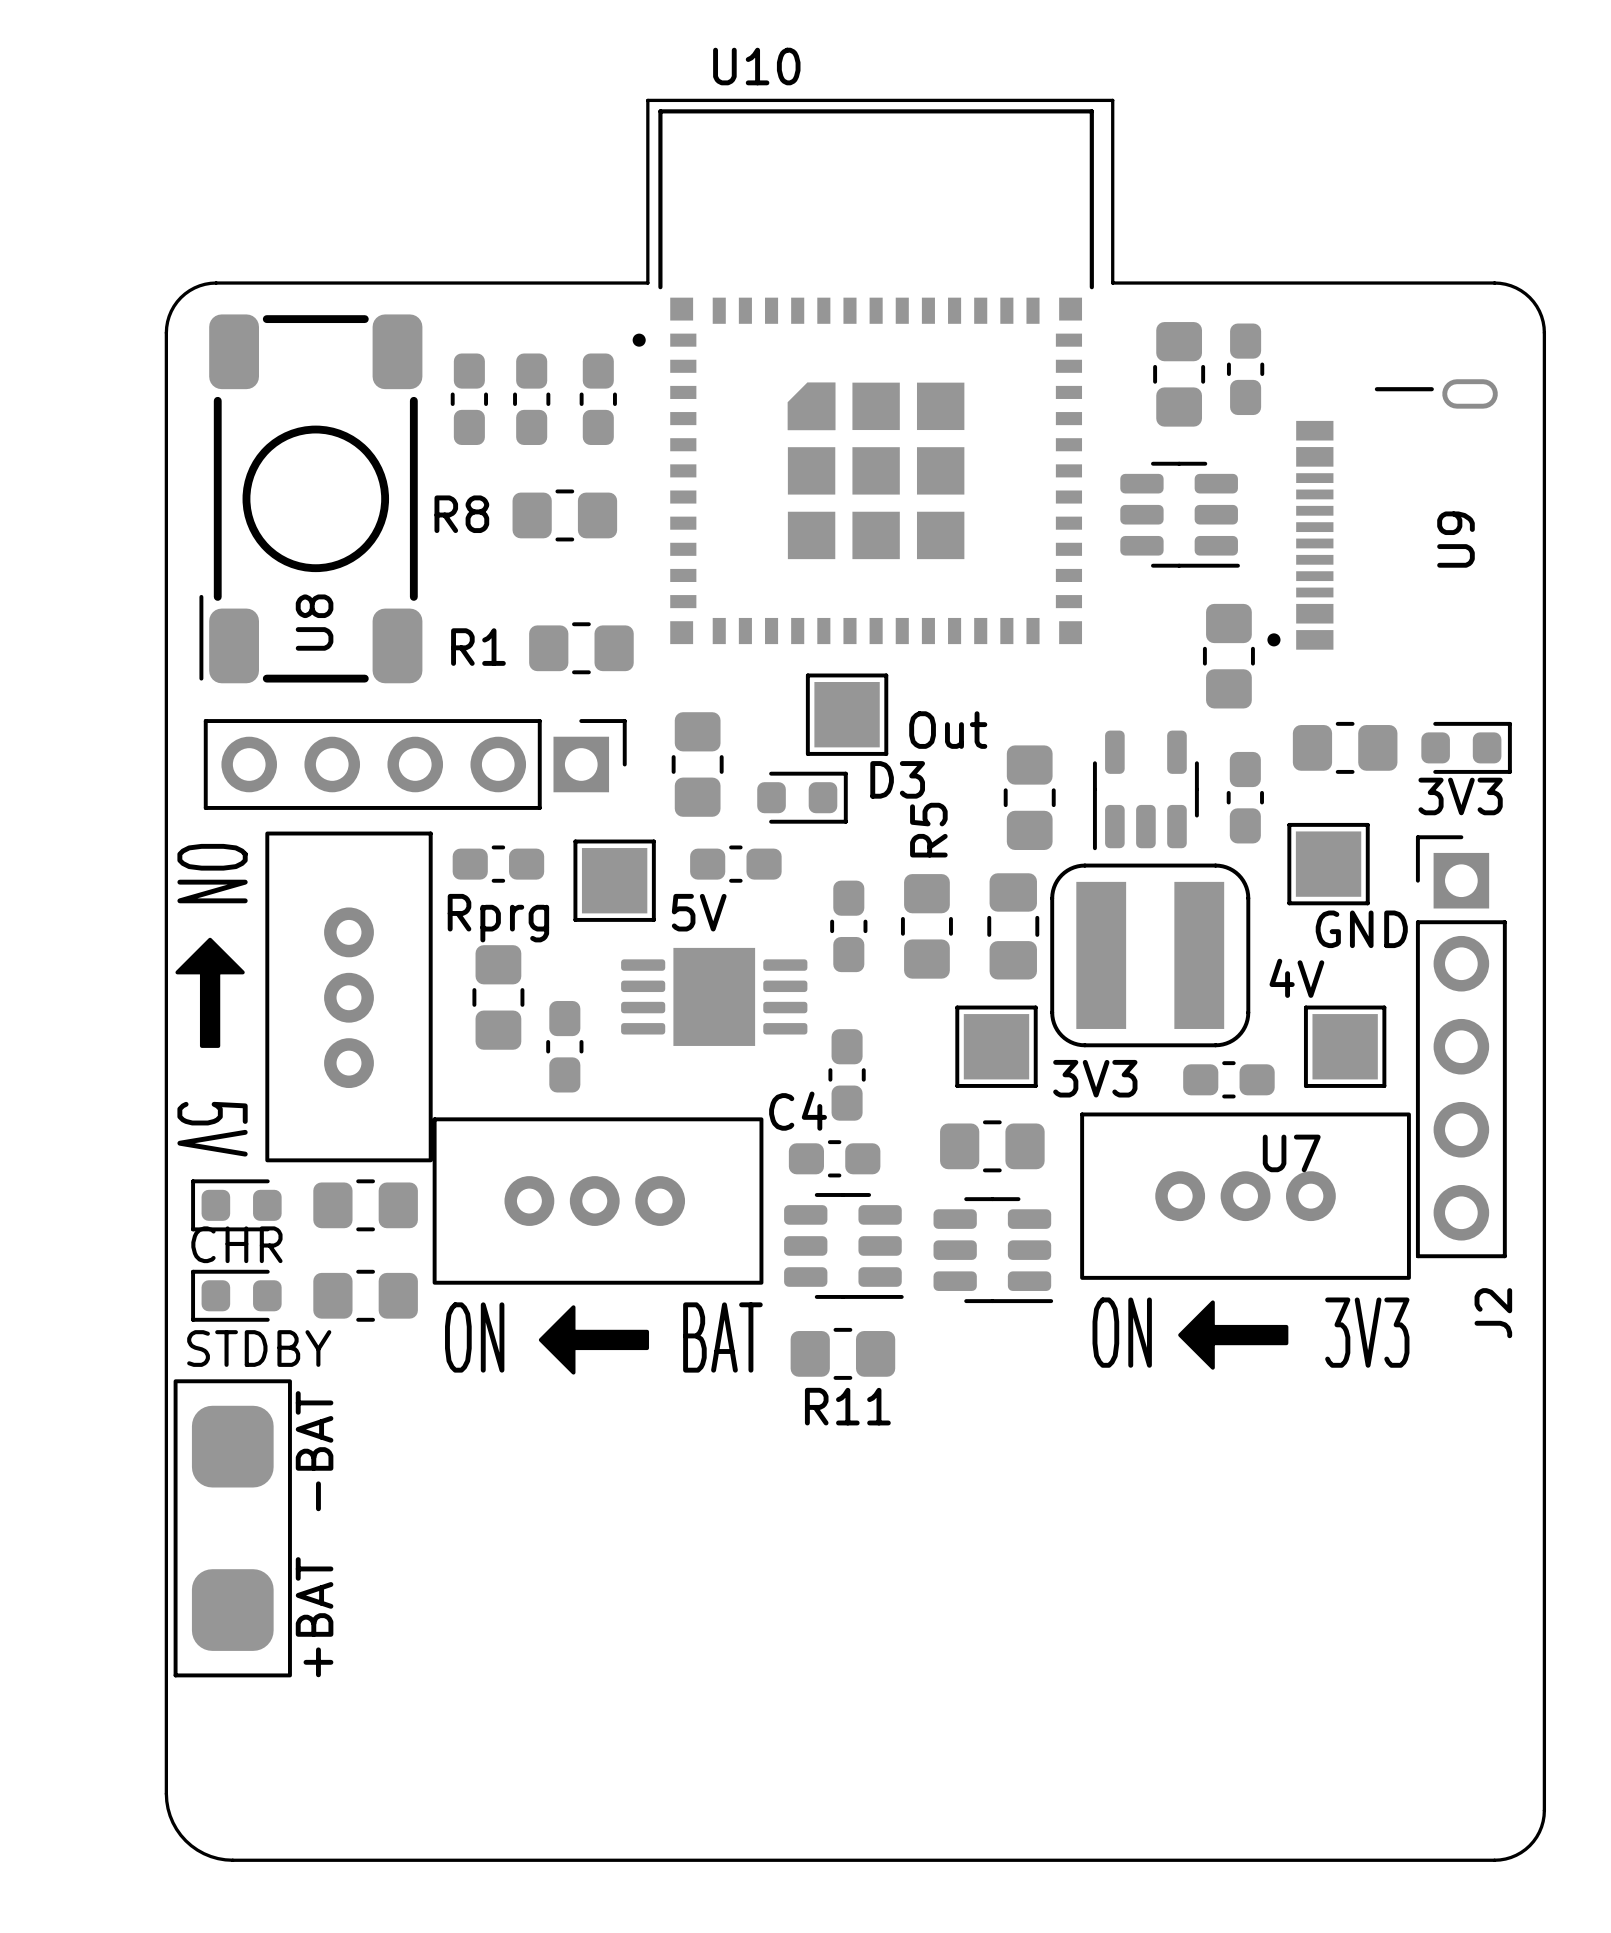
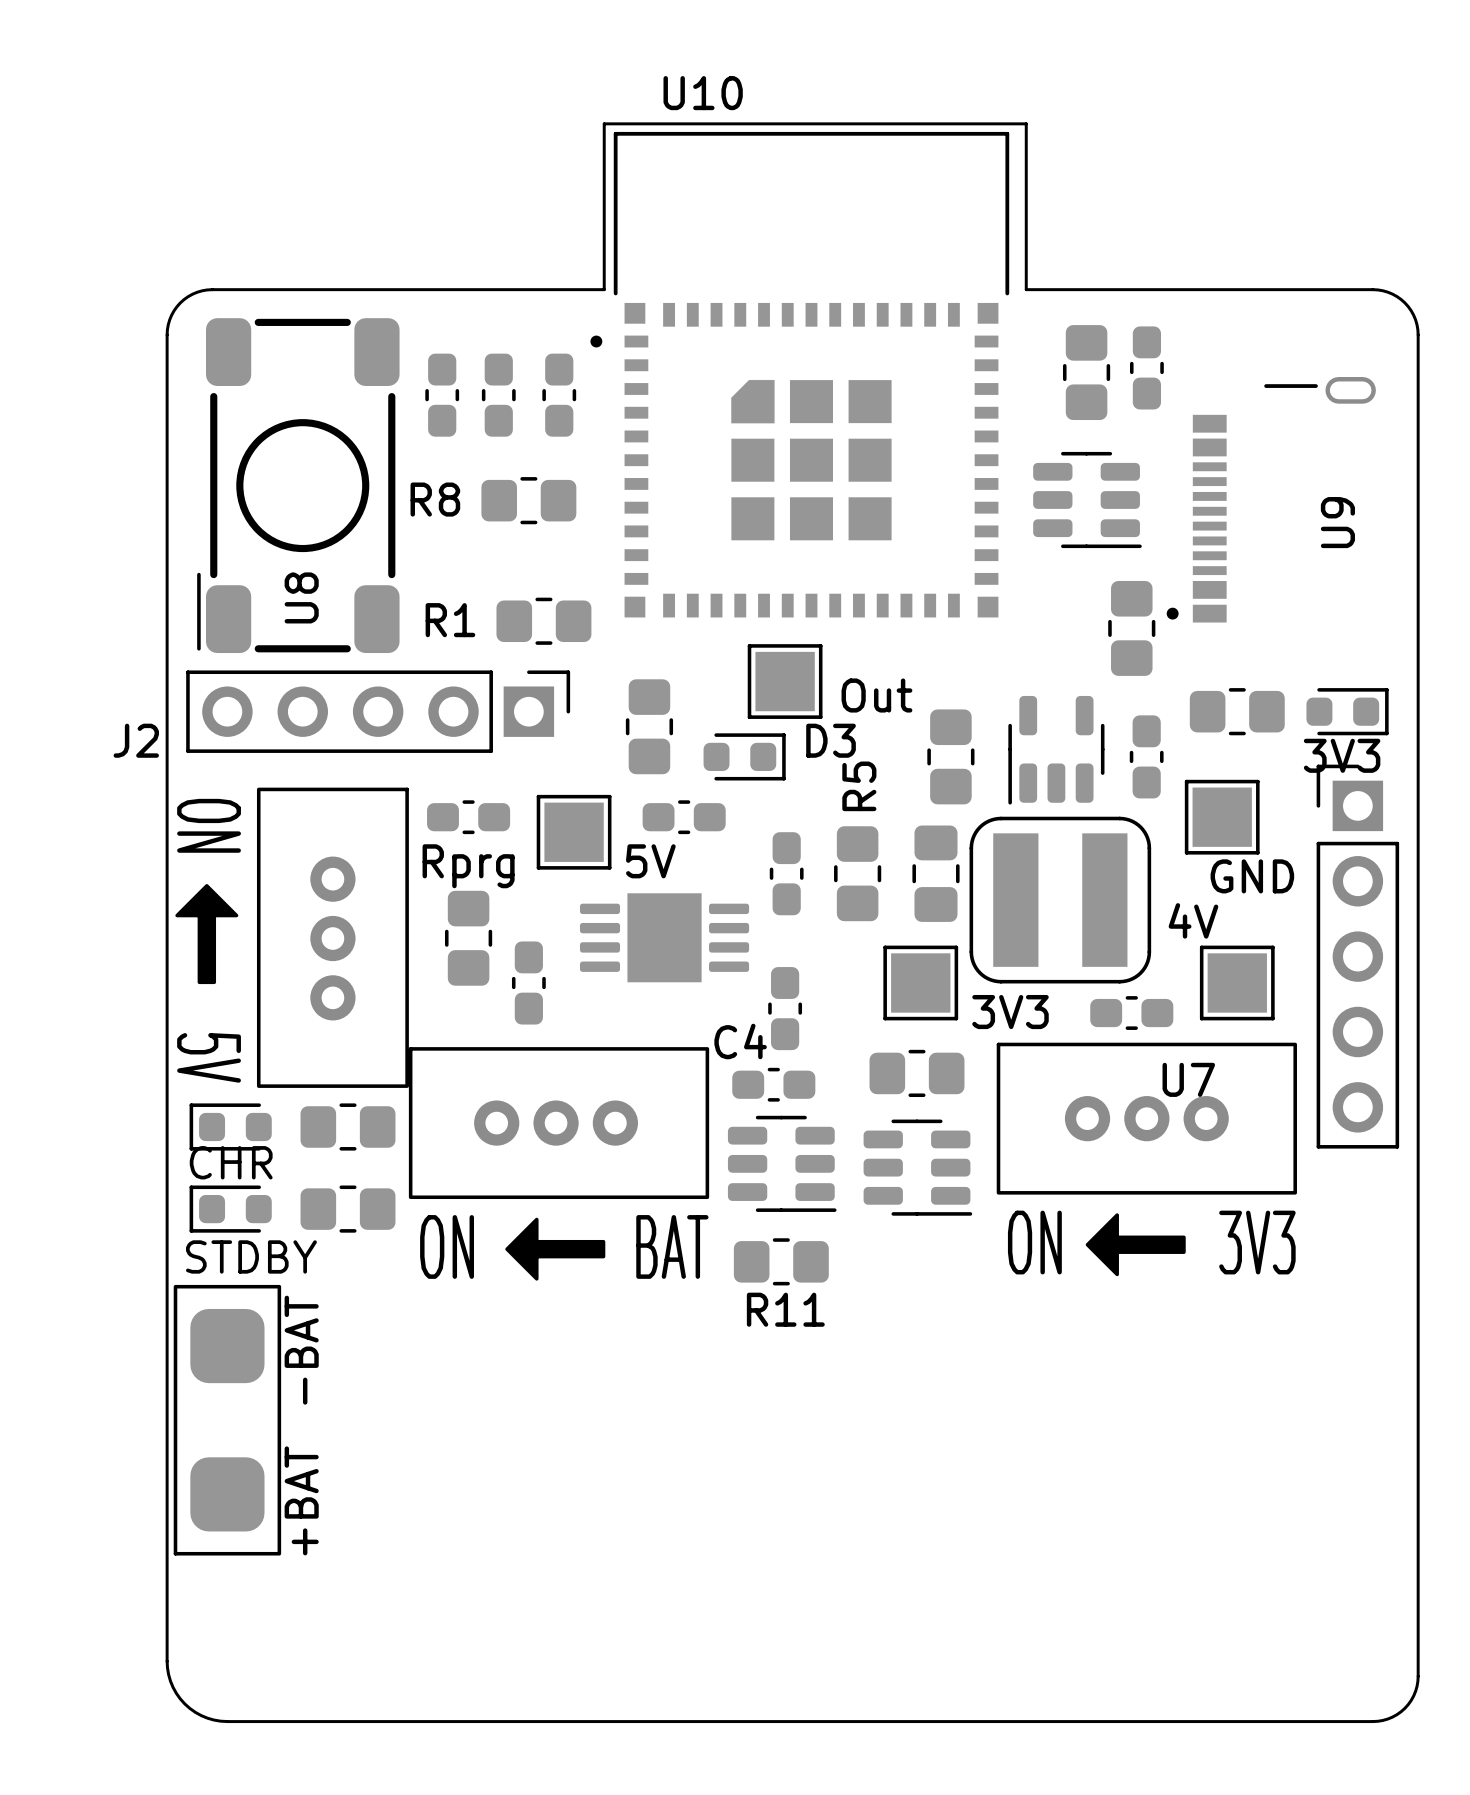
part: (415, 764) -> none
part: none -> (1357, 956)
J2 rotation: 0° (1461, 1046) -> 90° clockwise (378, 711)
J2 position: (1461, 1046) -> (378, 711)

